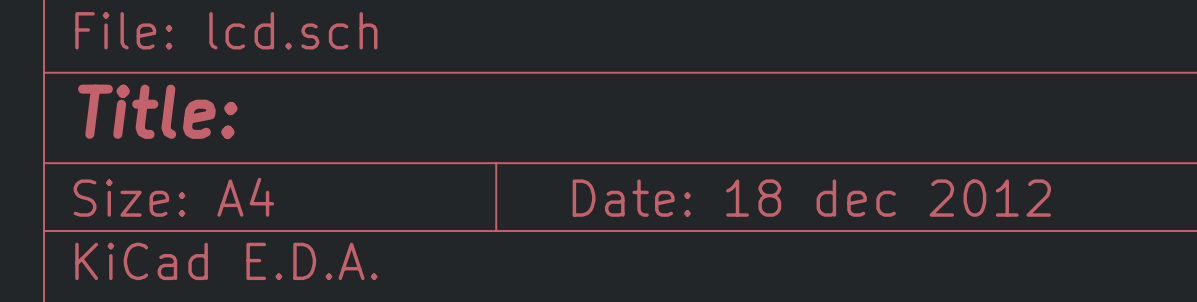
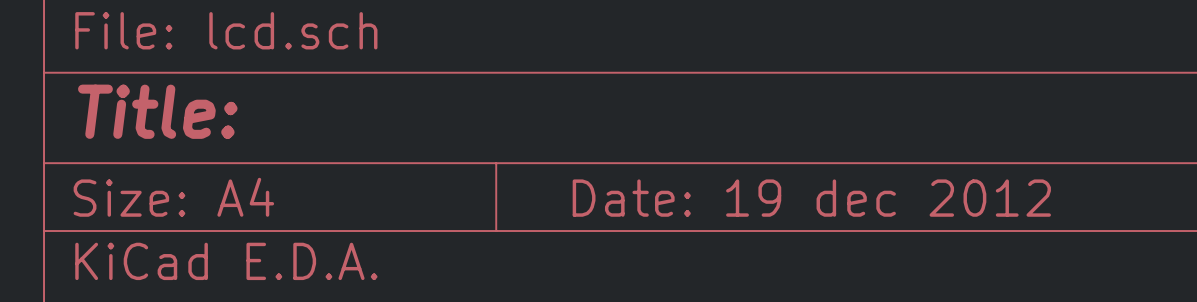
title block: Date: 18 dec 2012 (811, 198) -> Date: 19 dec 2012 (811, 198)

